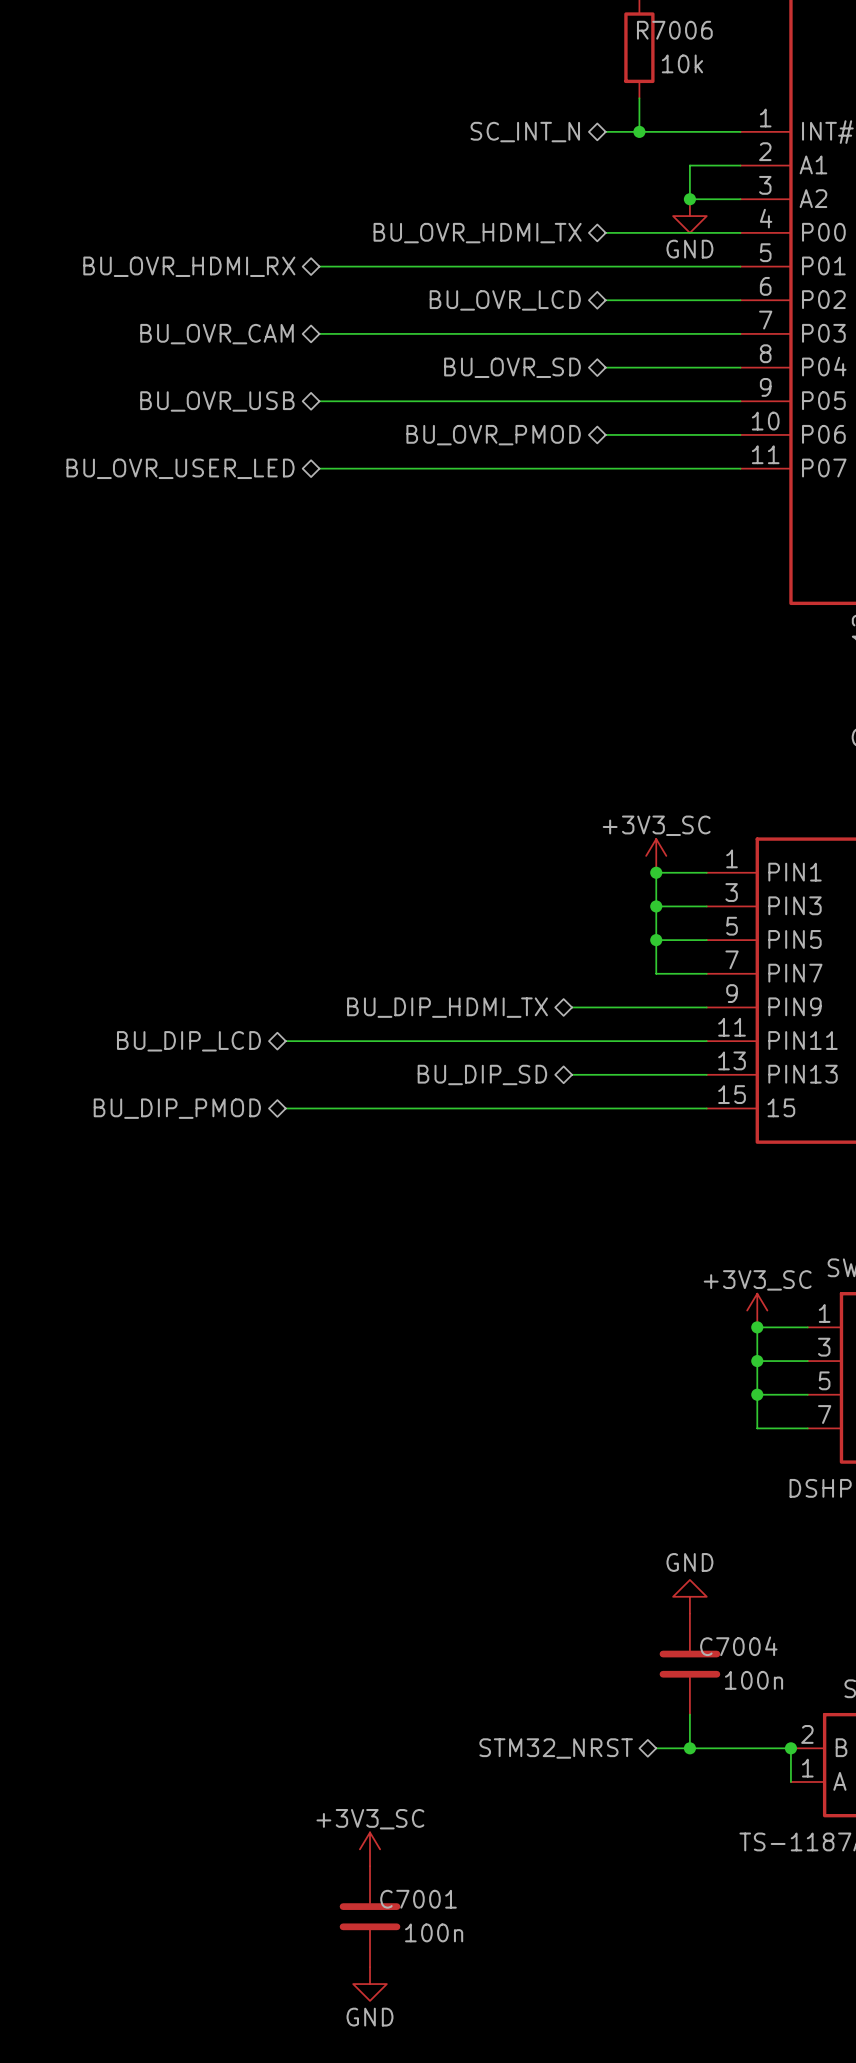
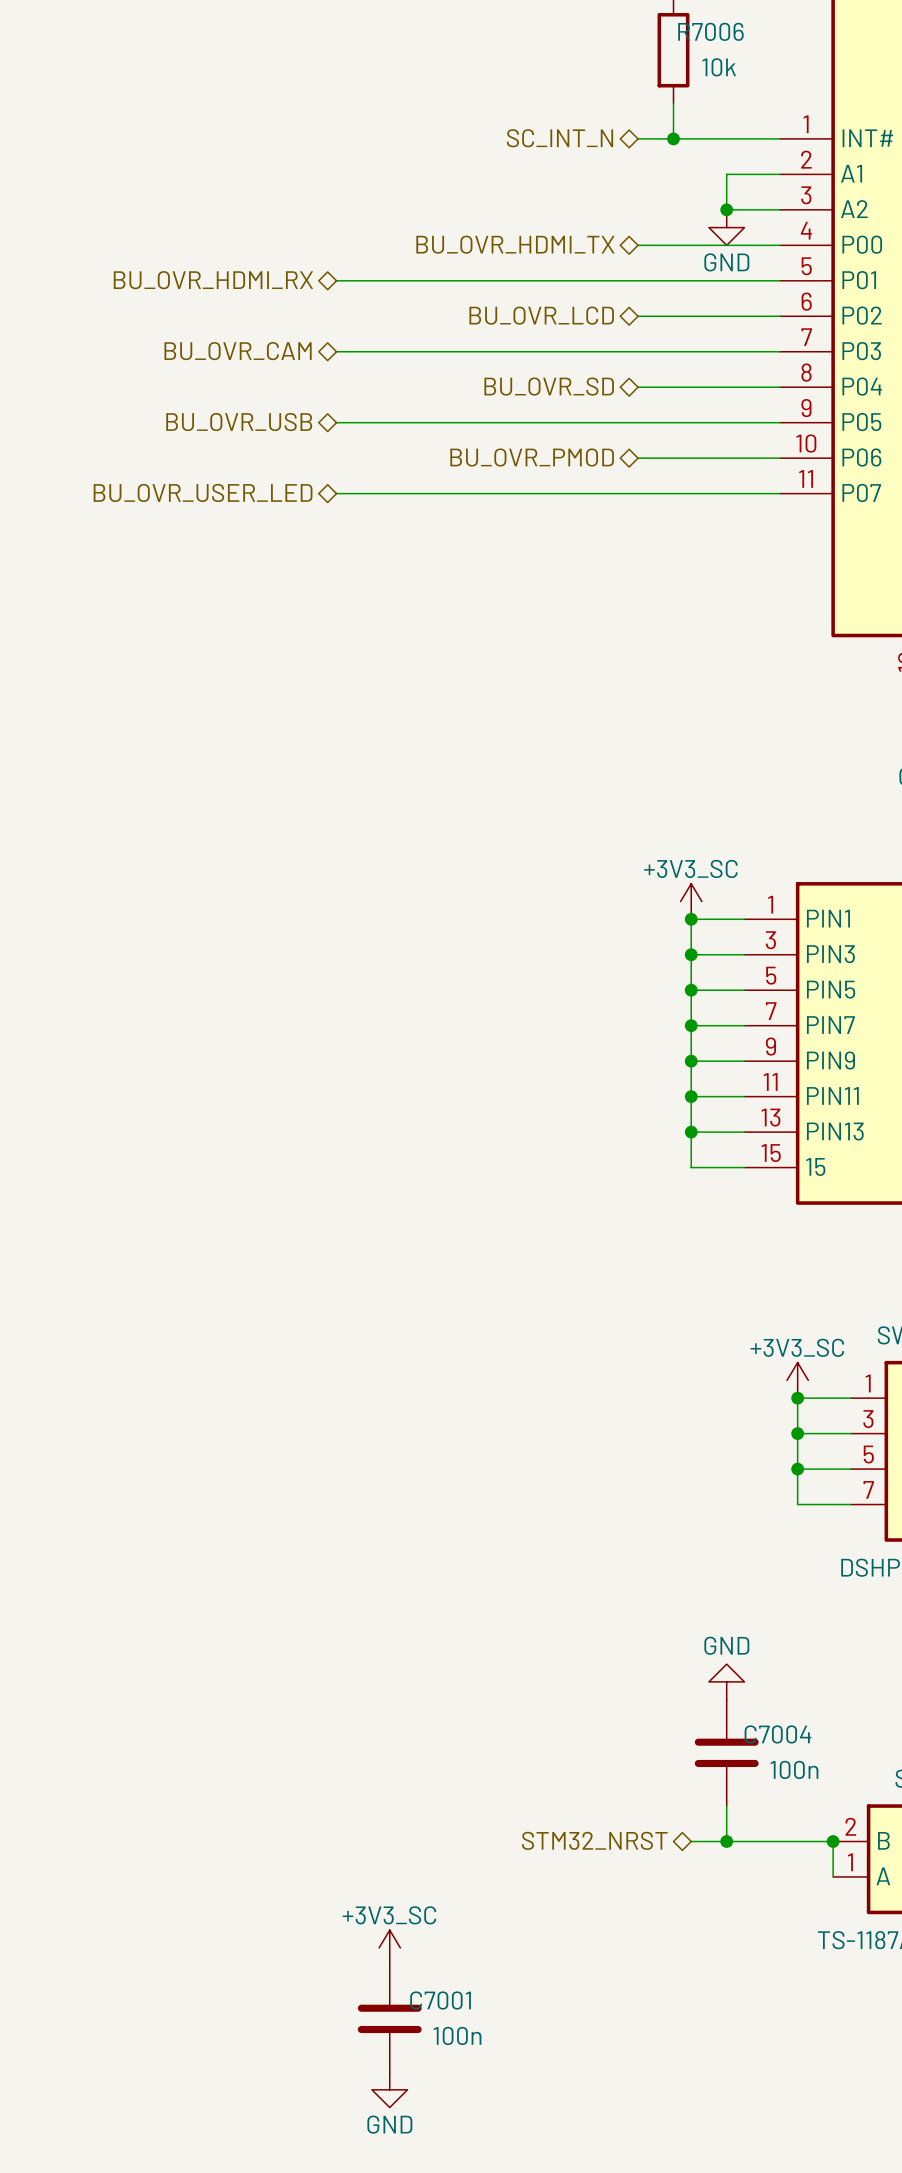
junction: none -> (691, 1025)
hierarchical label: BU_DIP_HDMI_TX (447, 1007) -> none
wire: (572, 1007) (656, 1007) -> none
junction: none -> (691, 1061)
hierarchical label: BU_DIP_LCD (188, 1041) -> none
wire: (285, 1041) (656, 1041) -> none
junction: none -> (691, 1096)
hierarchical label: BU_DIP_SD (482, 1074) -> none
wire: (572, 1074) (656, 1074) -> none
junction: none -> (691, 1132)
hierarchical label: BU_DIP_PMOD (177, 1108) -> none
wire: (285, 1108) (656, 1108) -> (691, 1025) (691, 1167)

